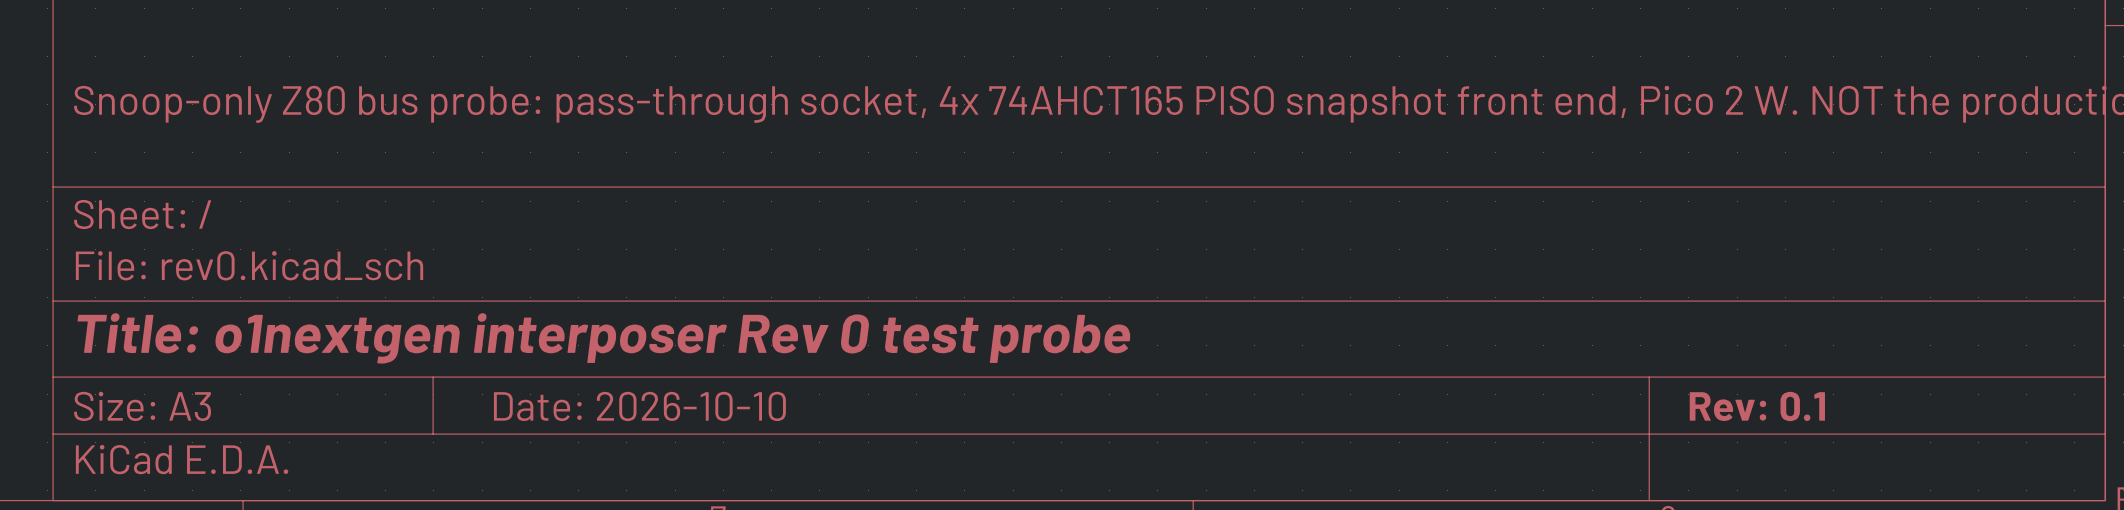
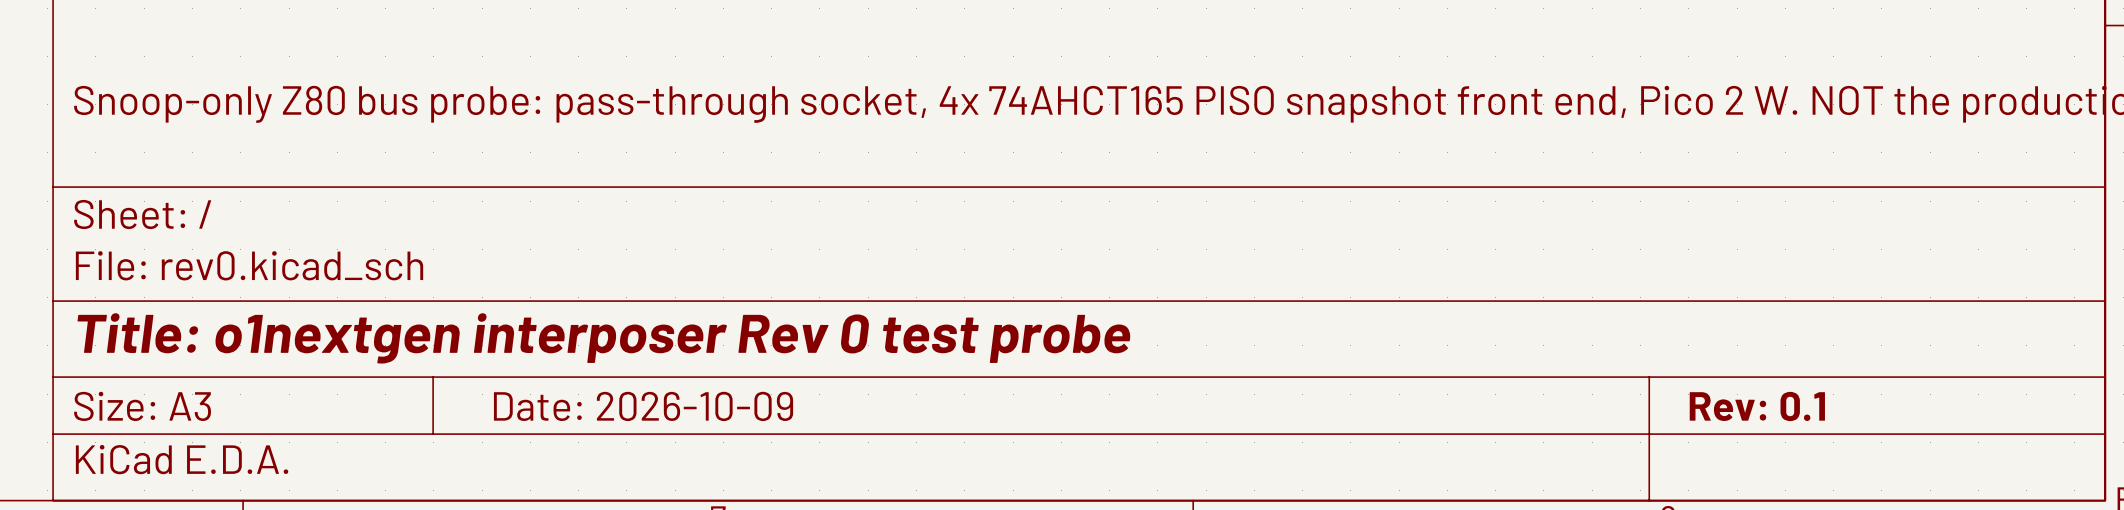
title block: Date: 2026-10-10 (639, 406) -> Date: 2026-10-09 (643, 406)

